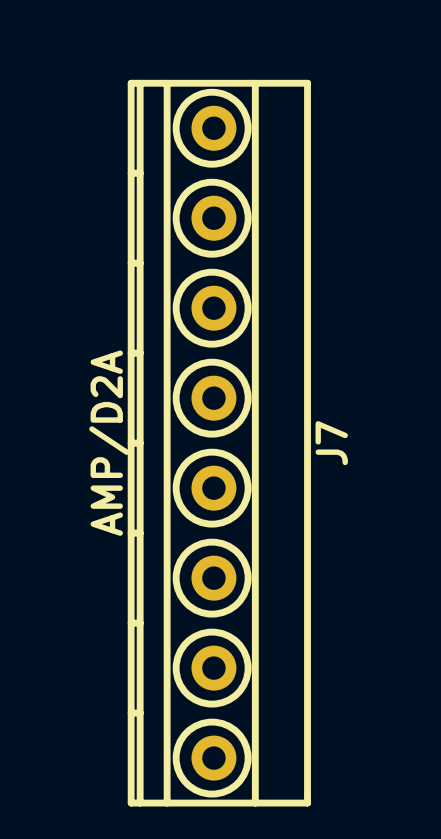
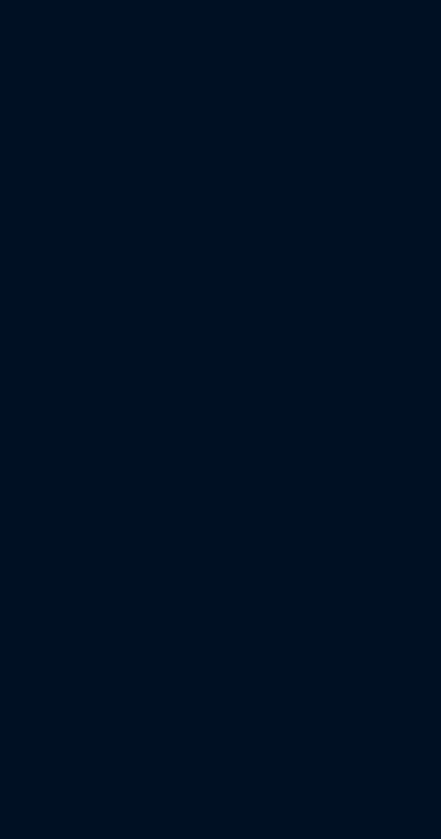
J7: AMP/D2A (219, 443) -> none

